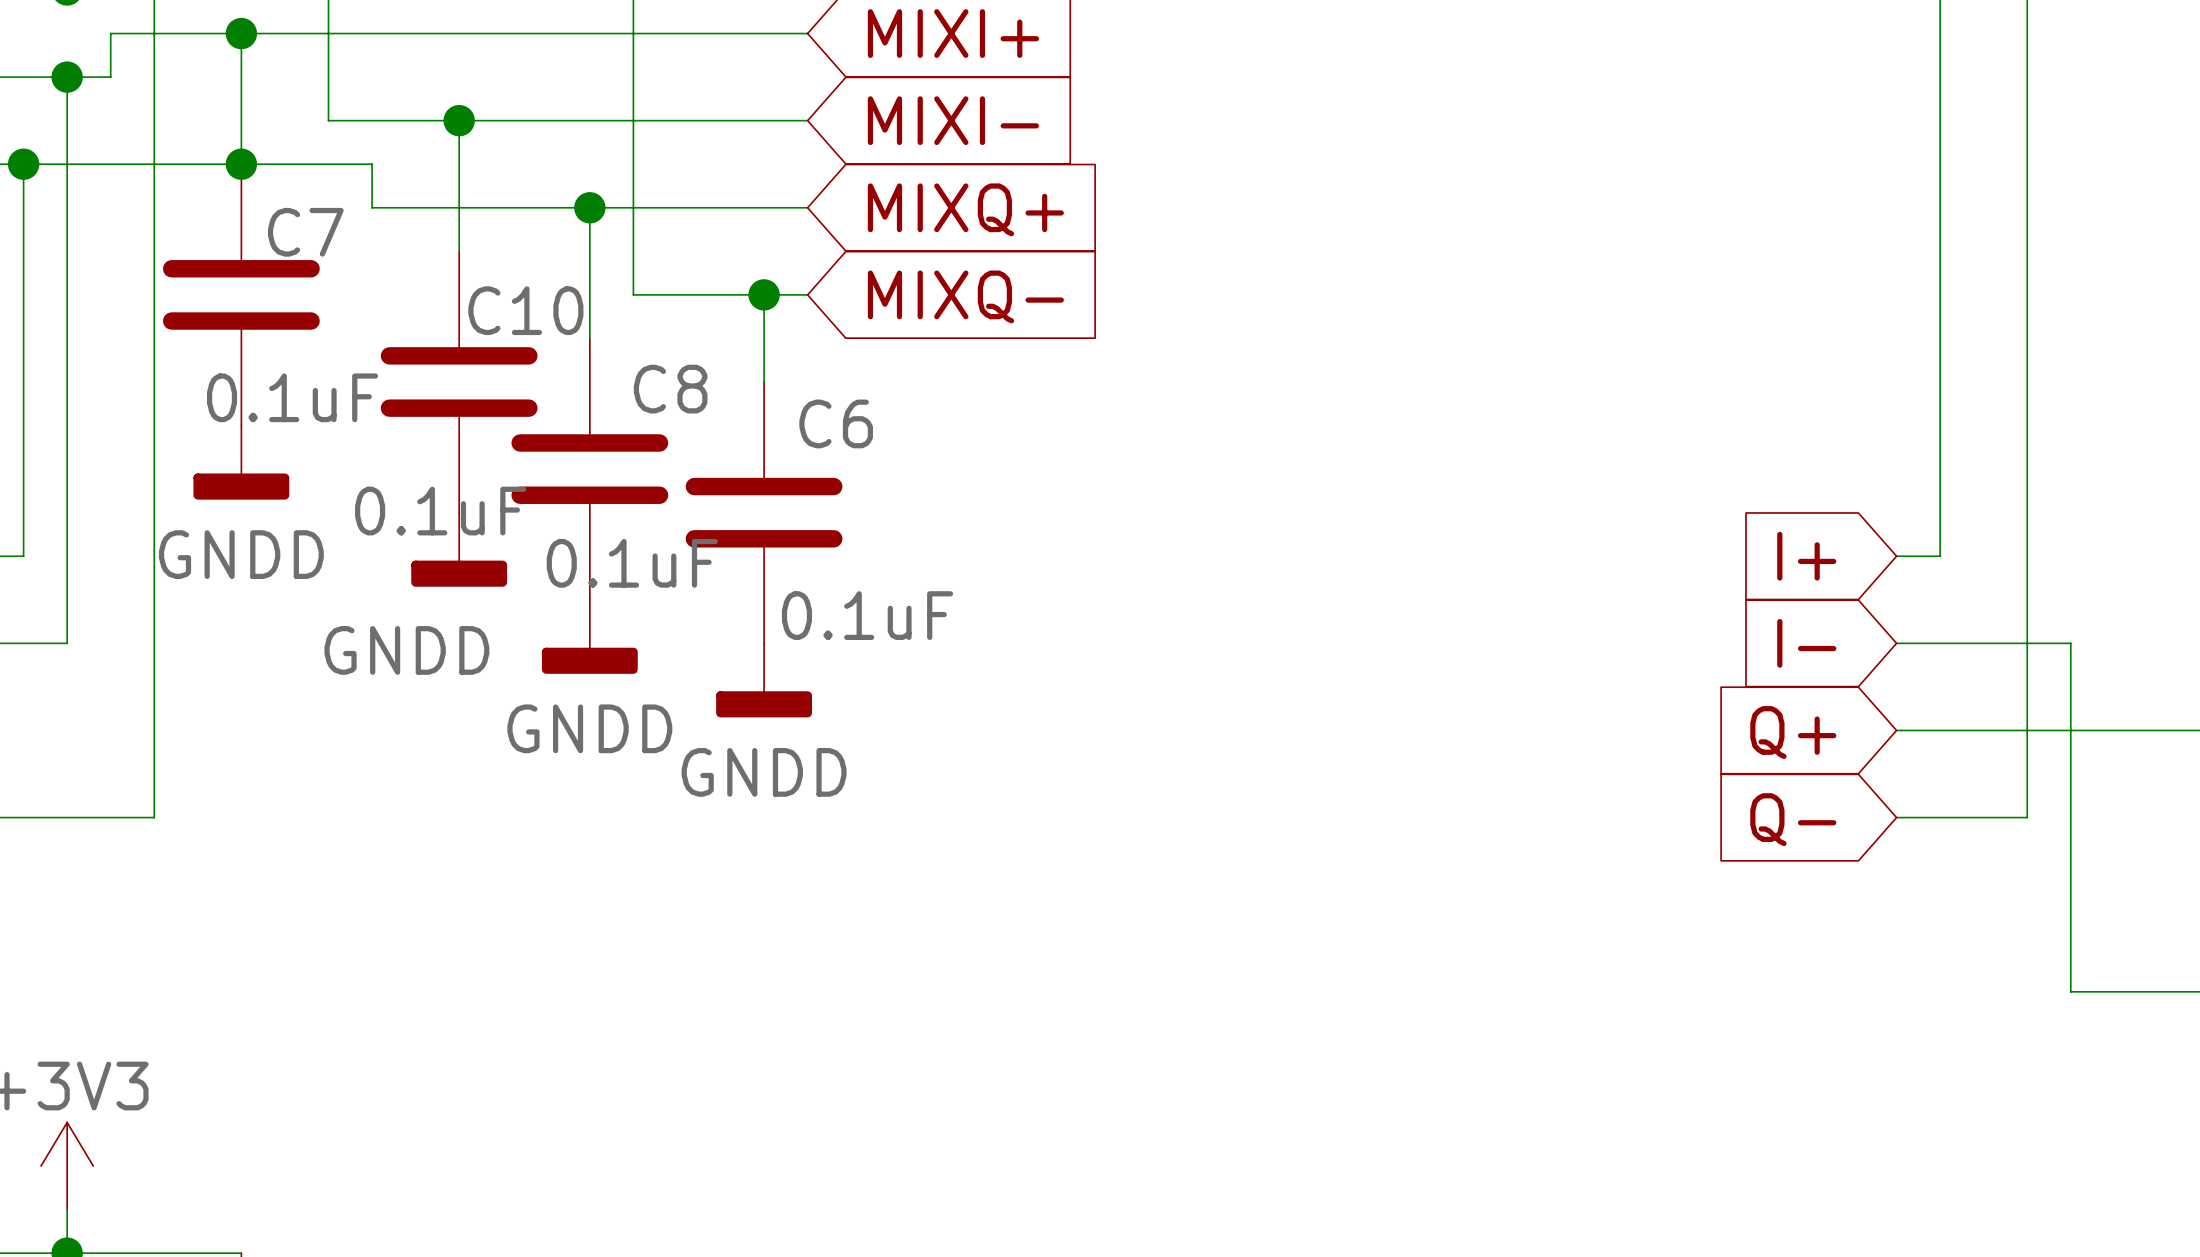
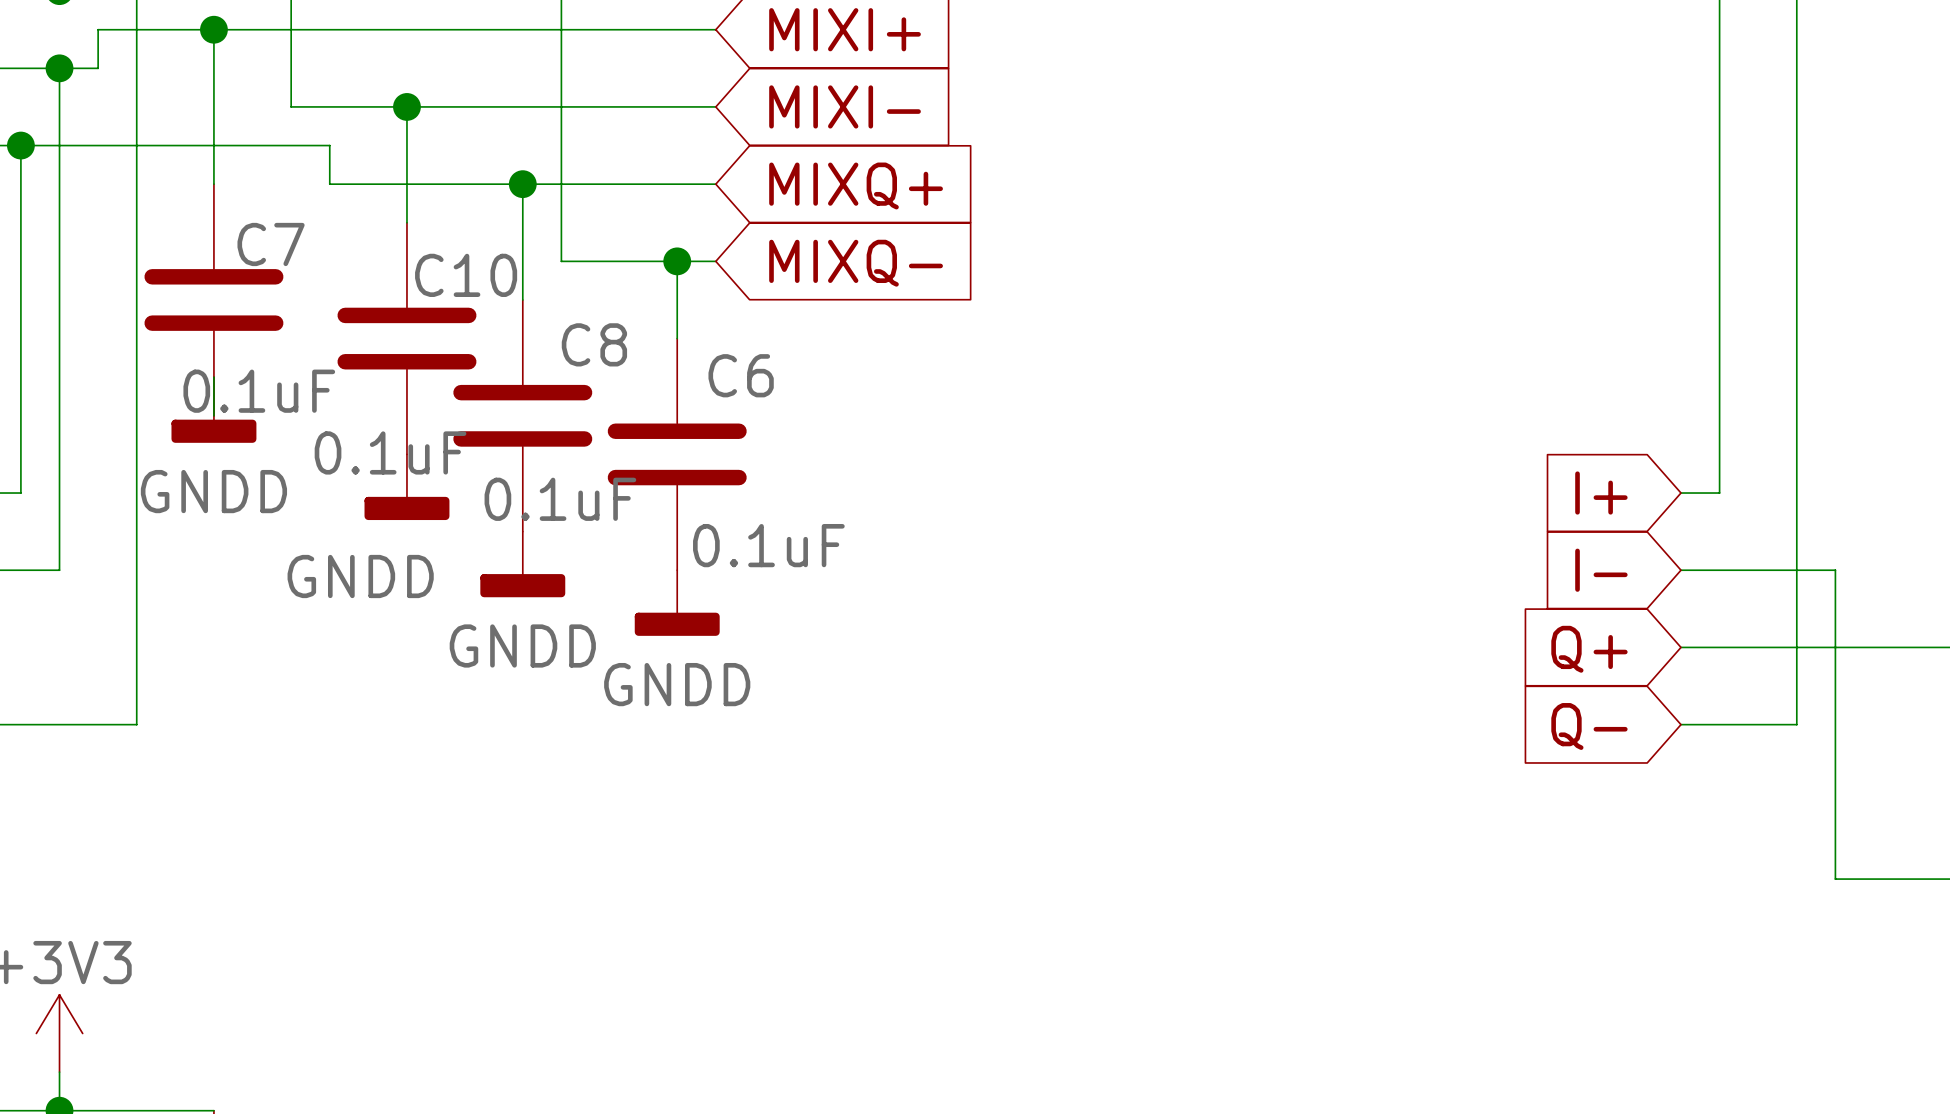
junction: (241, 164) -> none
C7 position: (241, 294) -> (213, 299)

